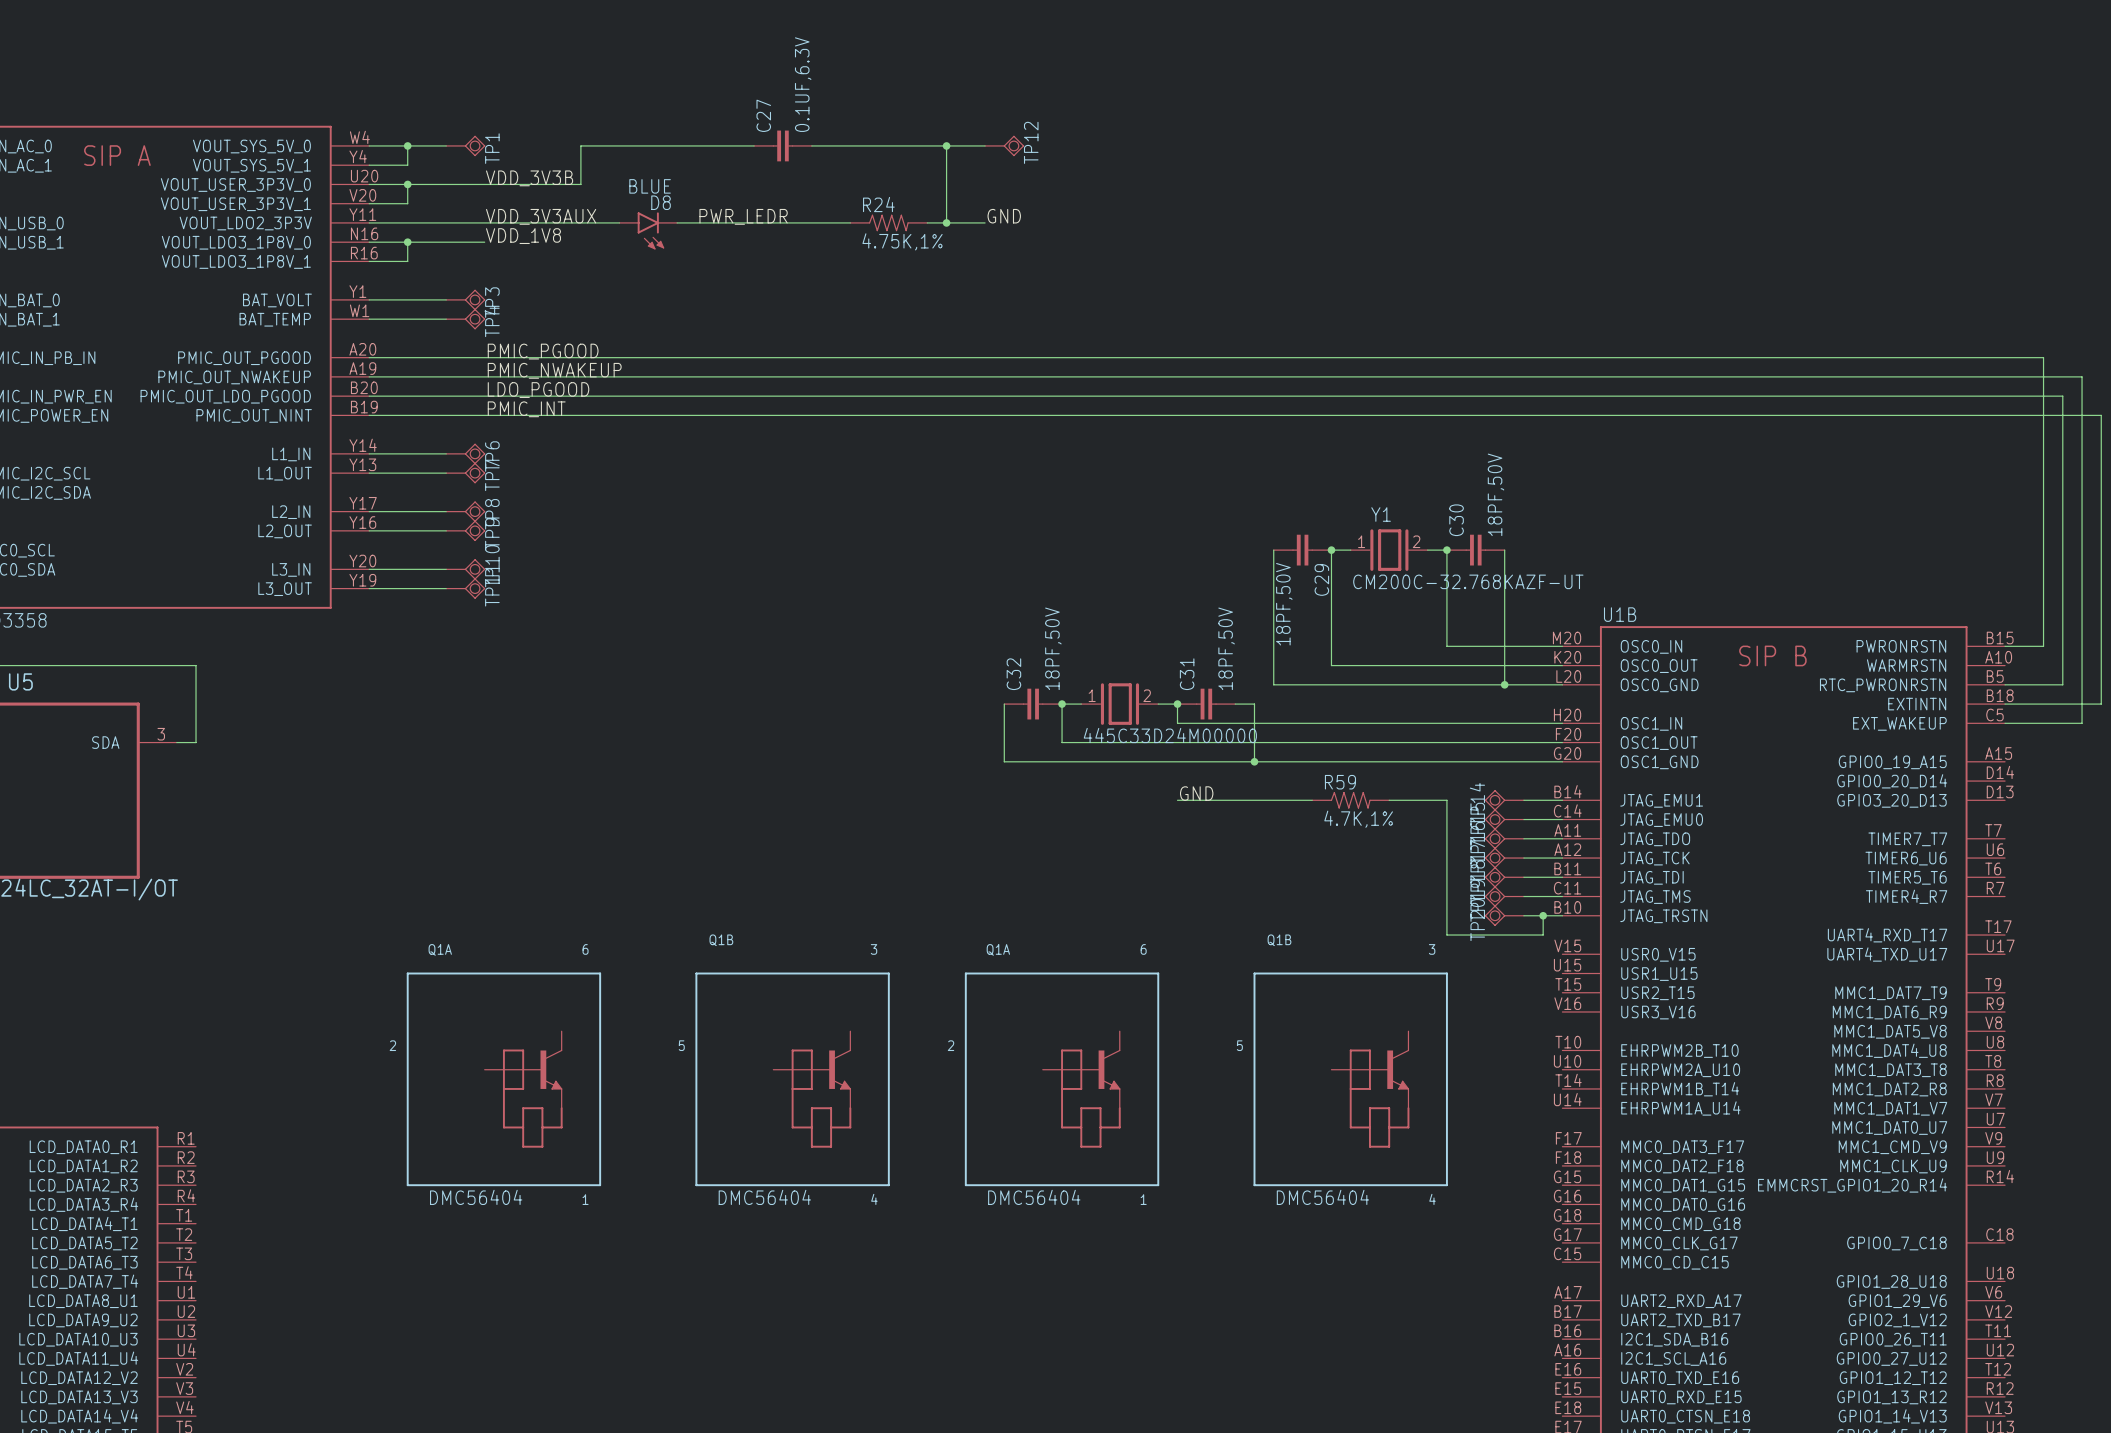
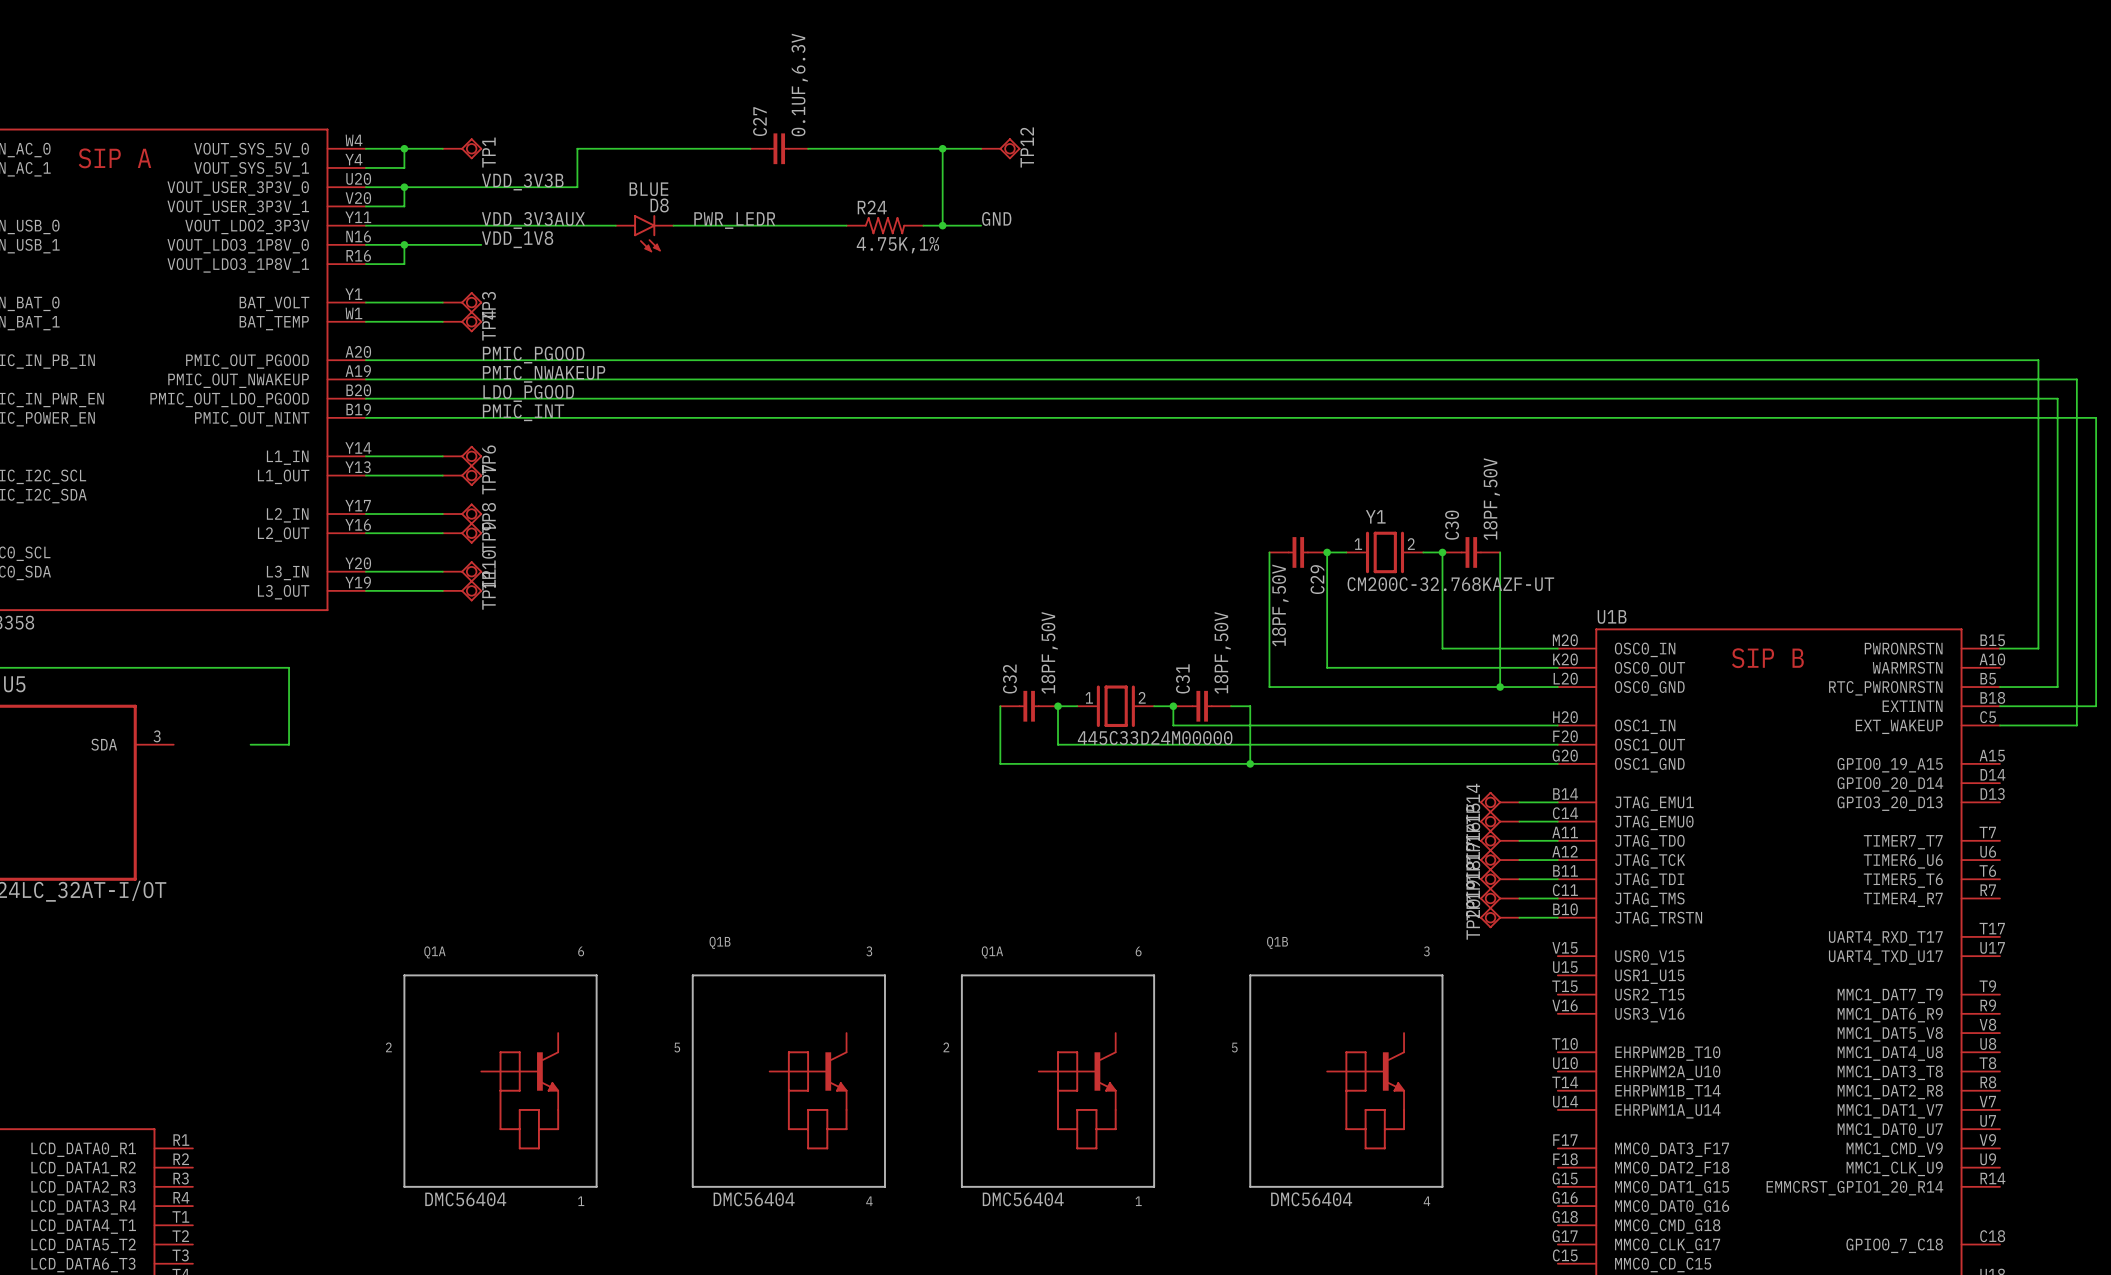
wire: (196, 665) (196, 742) (176, 742) -> (192, 667) (289, 667) (289, 744) (250, 744)
label: GND (1196, 793) -> none
wire: (1177, 800) (1312, 800) -> none
R59: 4.7K,1% (1350, 800) -> none
wire: (1389, 800) (1446, 800) (1446, 935) (1543, 935) (1543, 915) -> none
junction: (1543, 915) -> none

